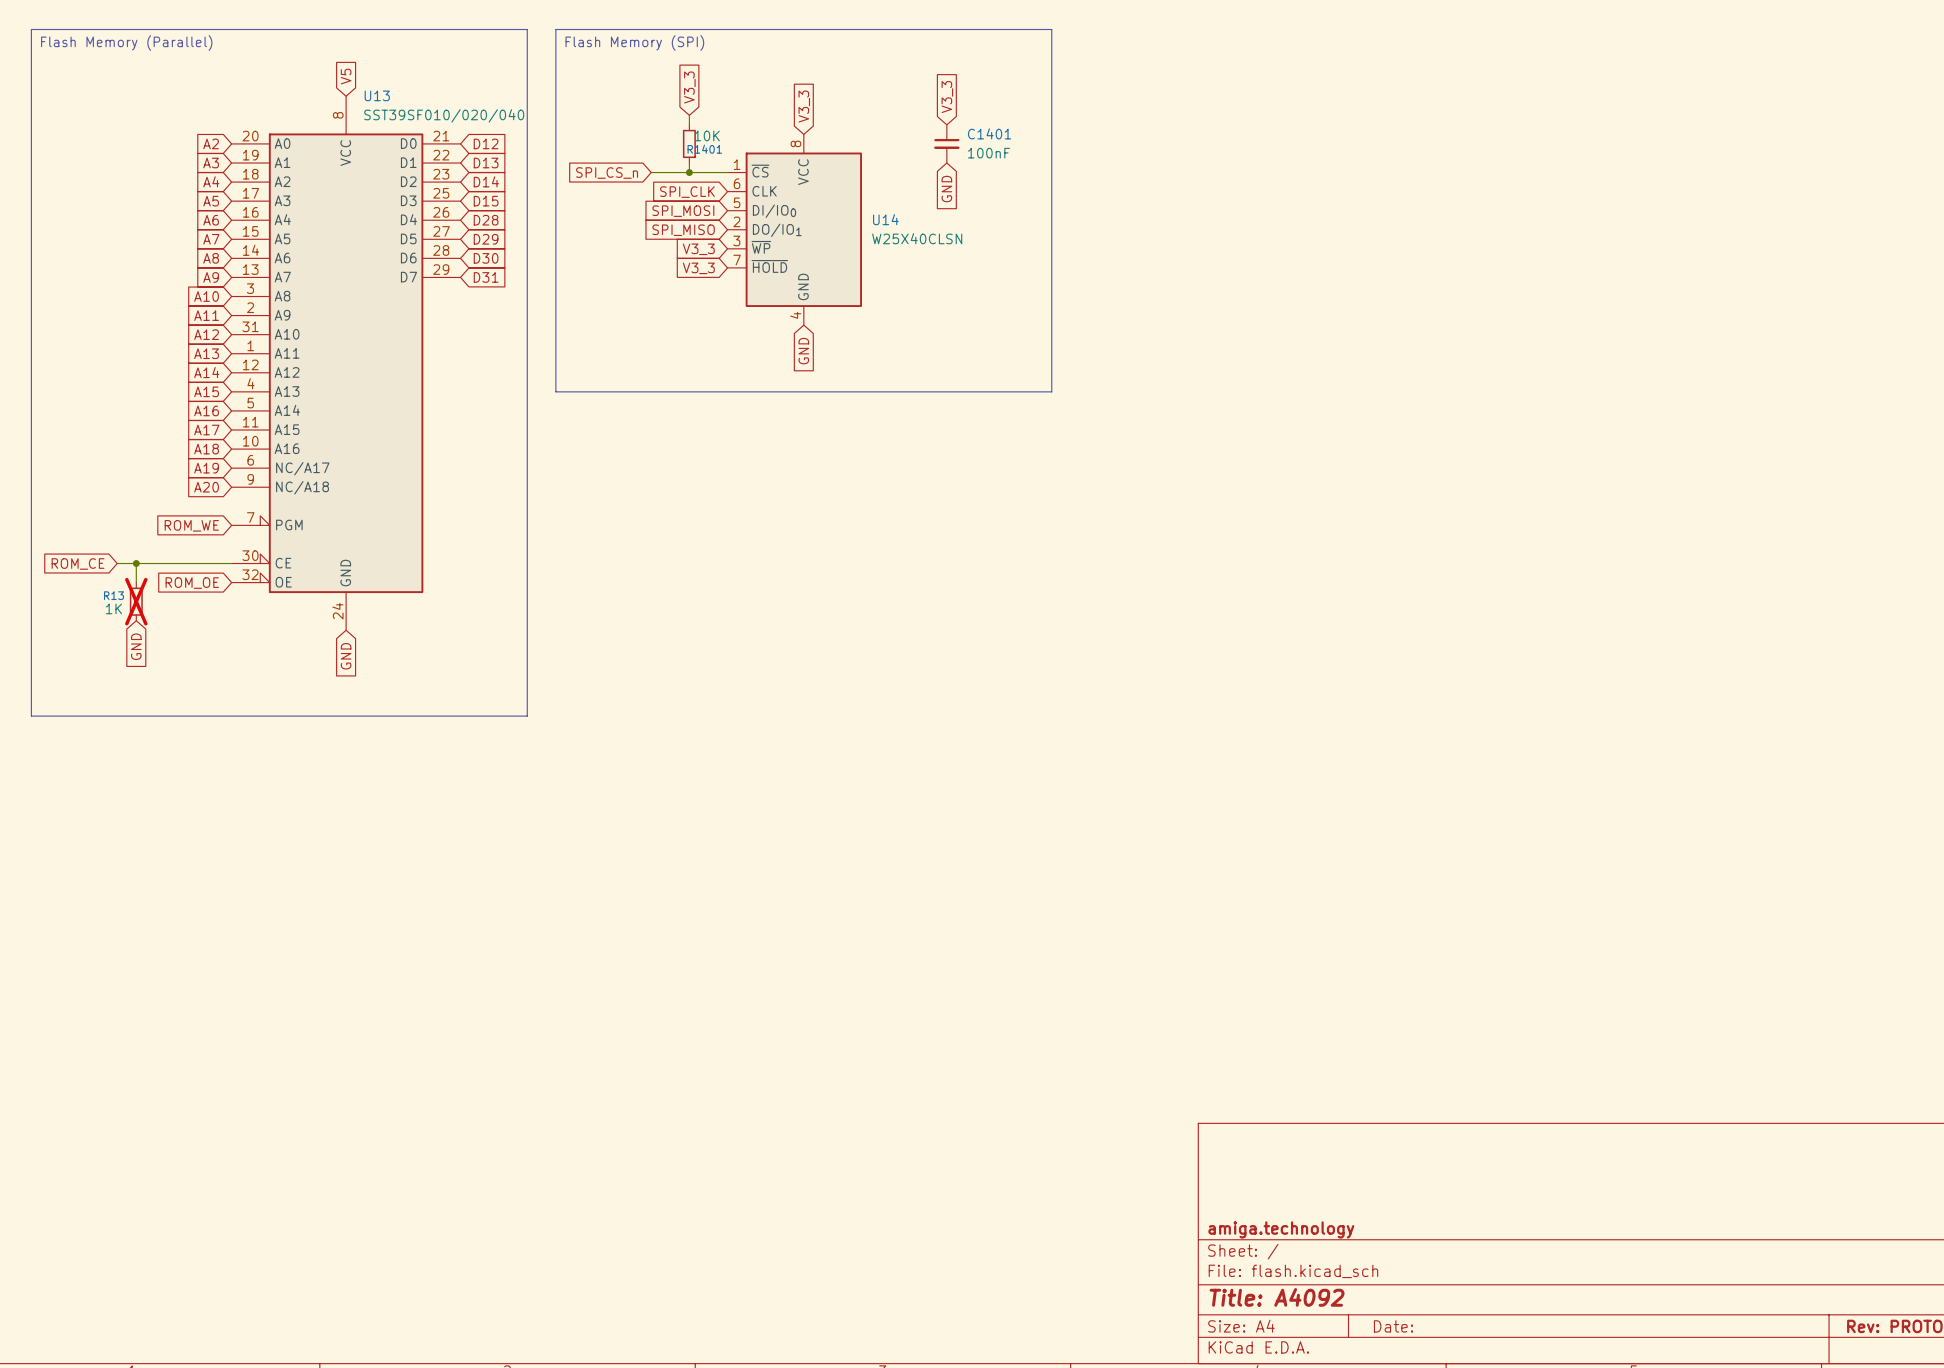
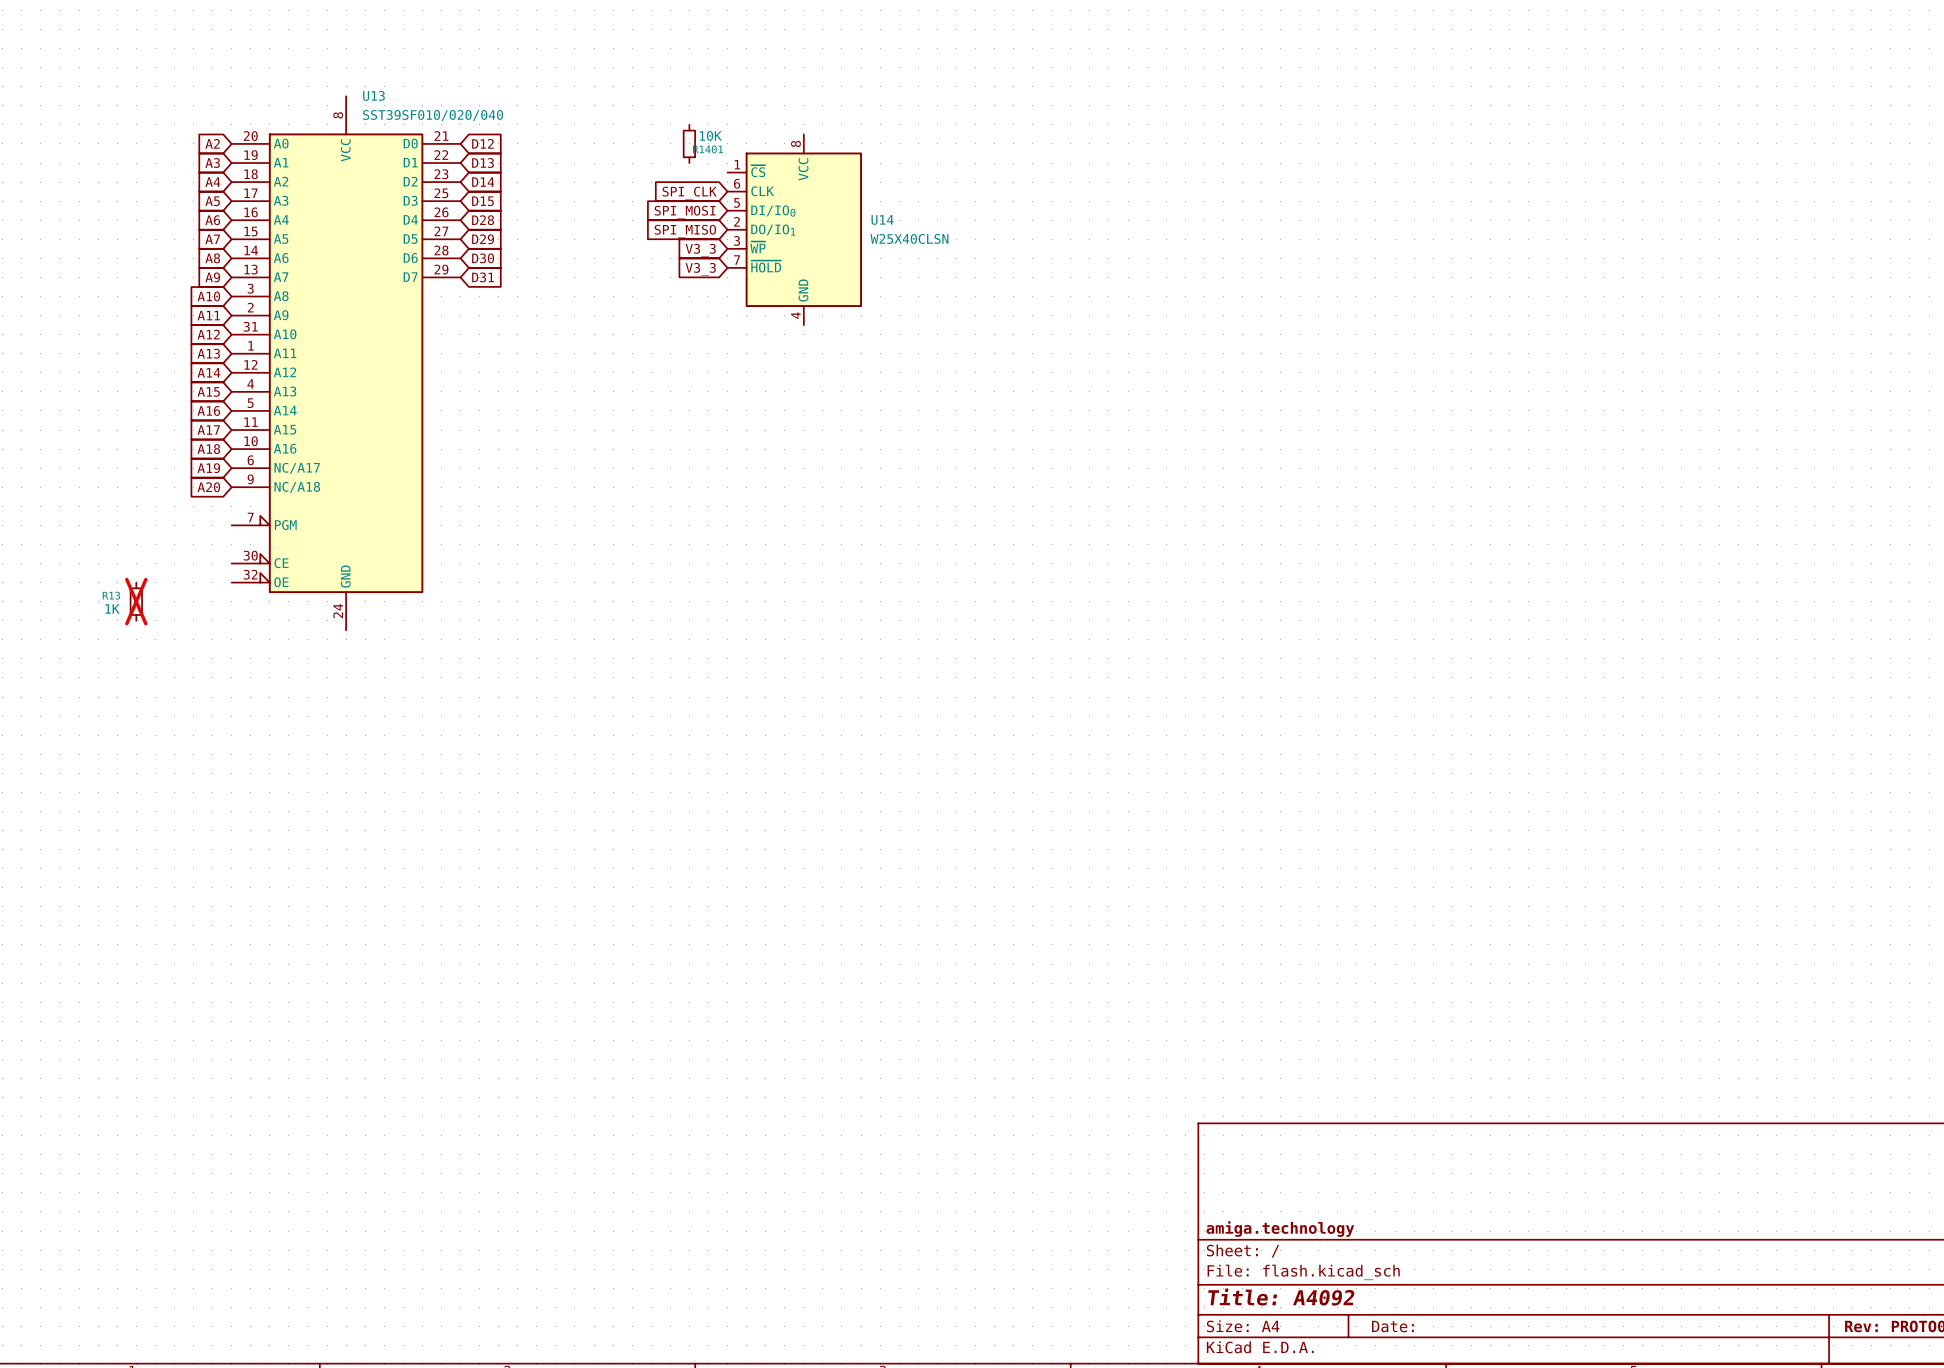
line: (31, 29) (527, 29) (527, 716) (31, 716) (31, 29) -> none
line: (555, 29) (1051, 29) (1051, 391) (555, 391) (555, 29) -> none
text: Flash Memory (Parallel) (126, 43) -> none
text: Flash Memory (SPI) (634, 43) -> none
global label: V5 (346, 76) -> none
global label: V3_3 (689, 87) -> none
global label: V3_3 (947, 97) -> none
global label: V3_3 (804, 106) -> none
wire: (689, 115) (689, 124) -> none
C1401: 100nF (946, 143) -> none
wire: (689, 163) (689, 172) -> none
global label: SPI_CS_n (607, 172) -> none
wire: (651, 172) (727, 172) -> none
junction: (689, 172) -> none
global label: GND (946, 189) -> none
global label: GND (803, 351) -> none
global label: ROM_WE (191, 525) -> none
global label: ROM_CE (78, 563) -> none
wire: (117, 563) (231, 563) -> none
wire: (136, 563) (136, 582) -> none
junction: (136, 563) -> none
global label: ROM_OE (192, 583) -> none
global label: GND (136, 646) -> none
global label: GND (346, 656) -> none

